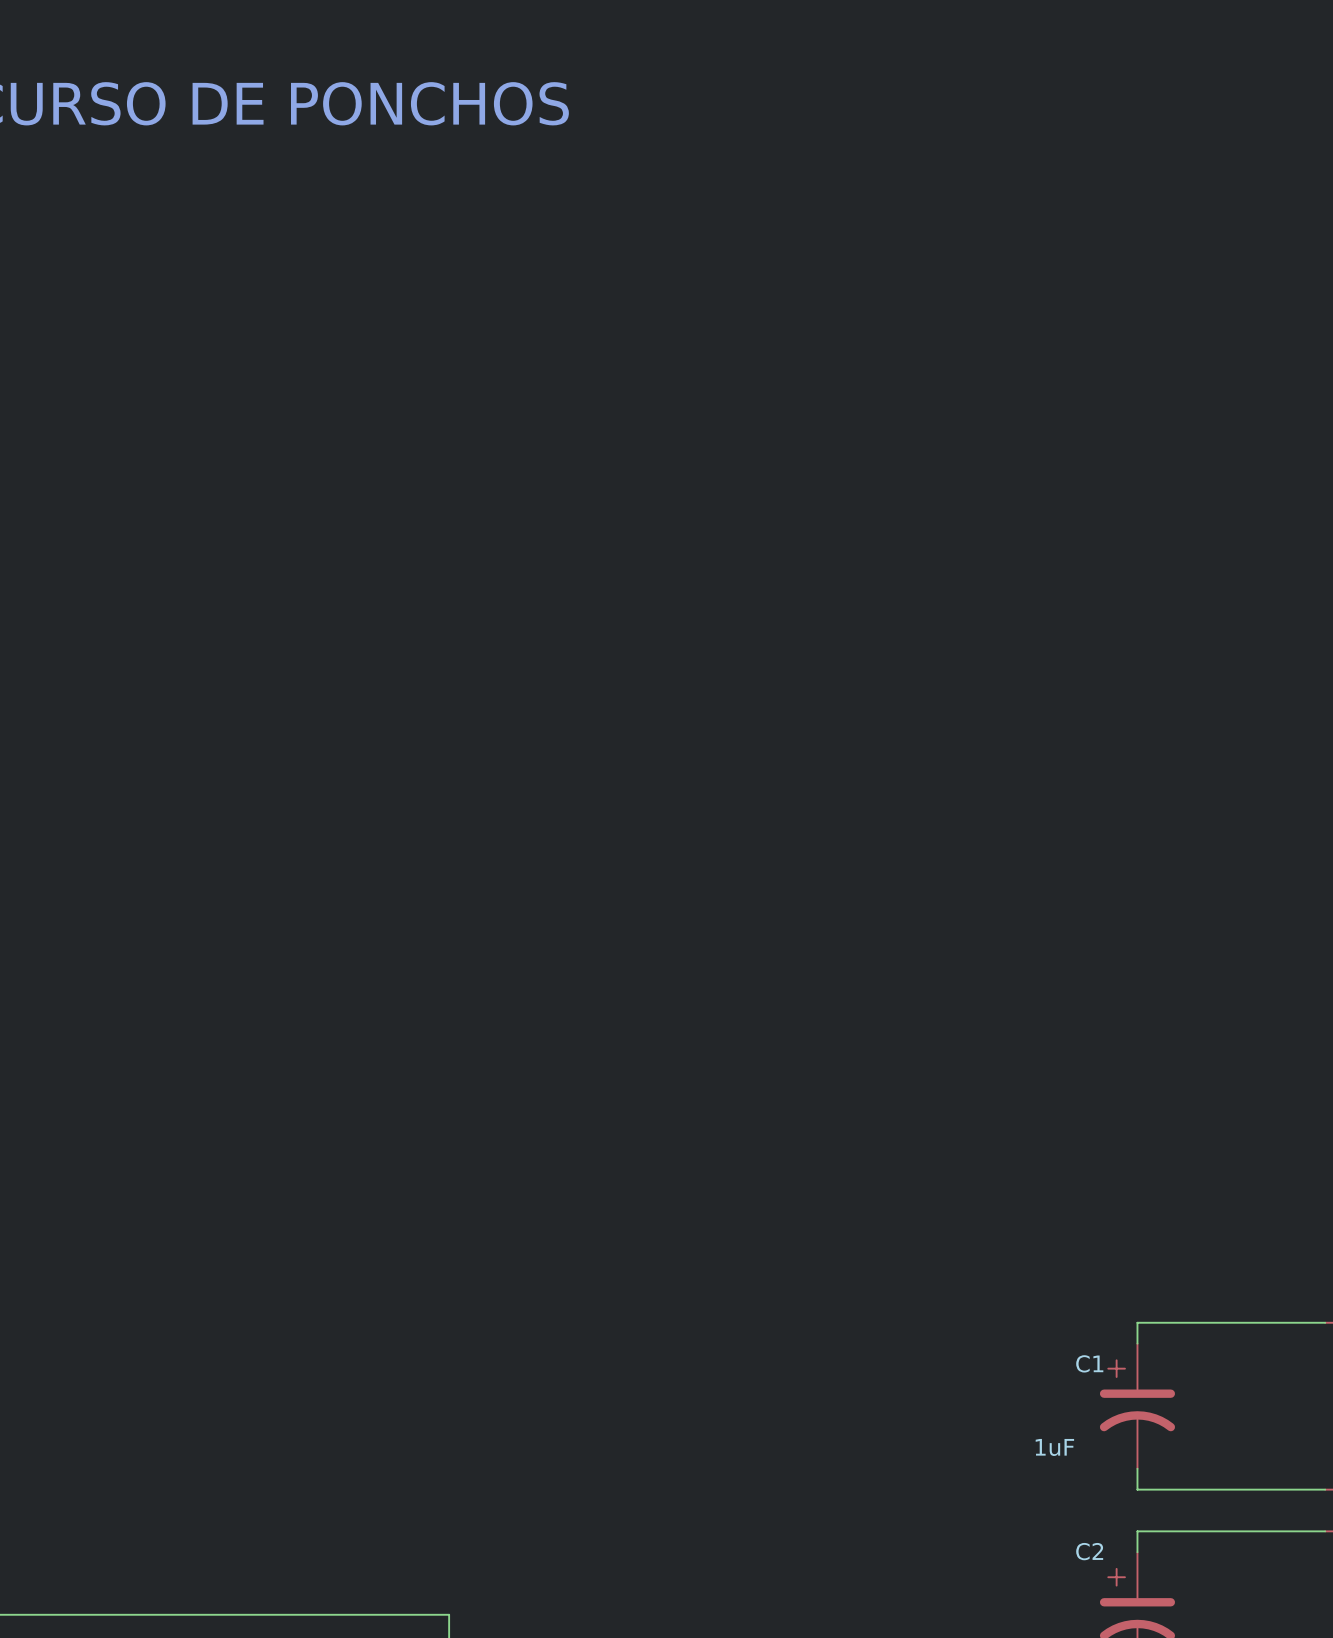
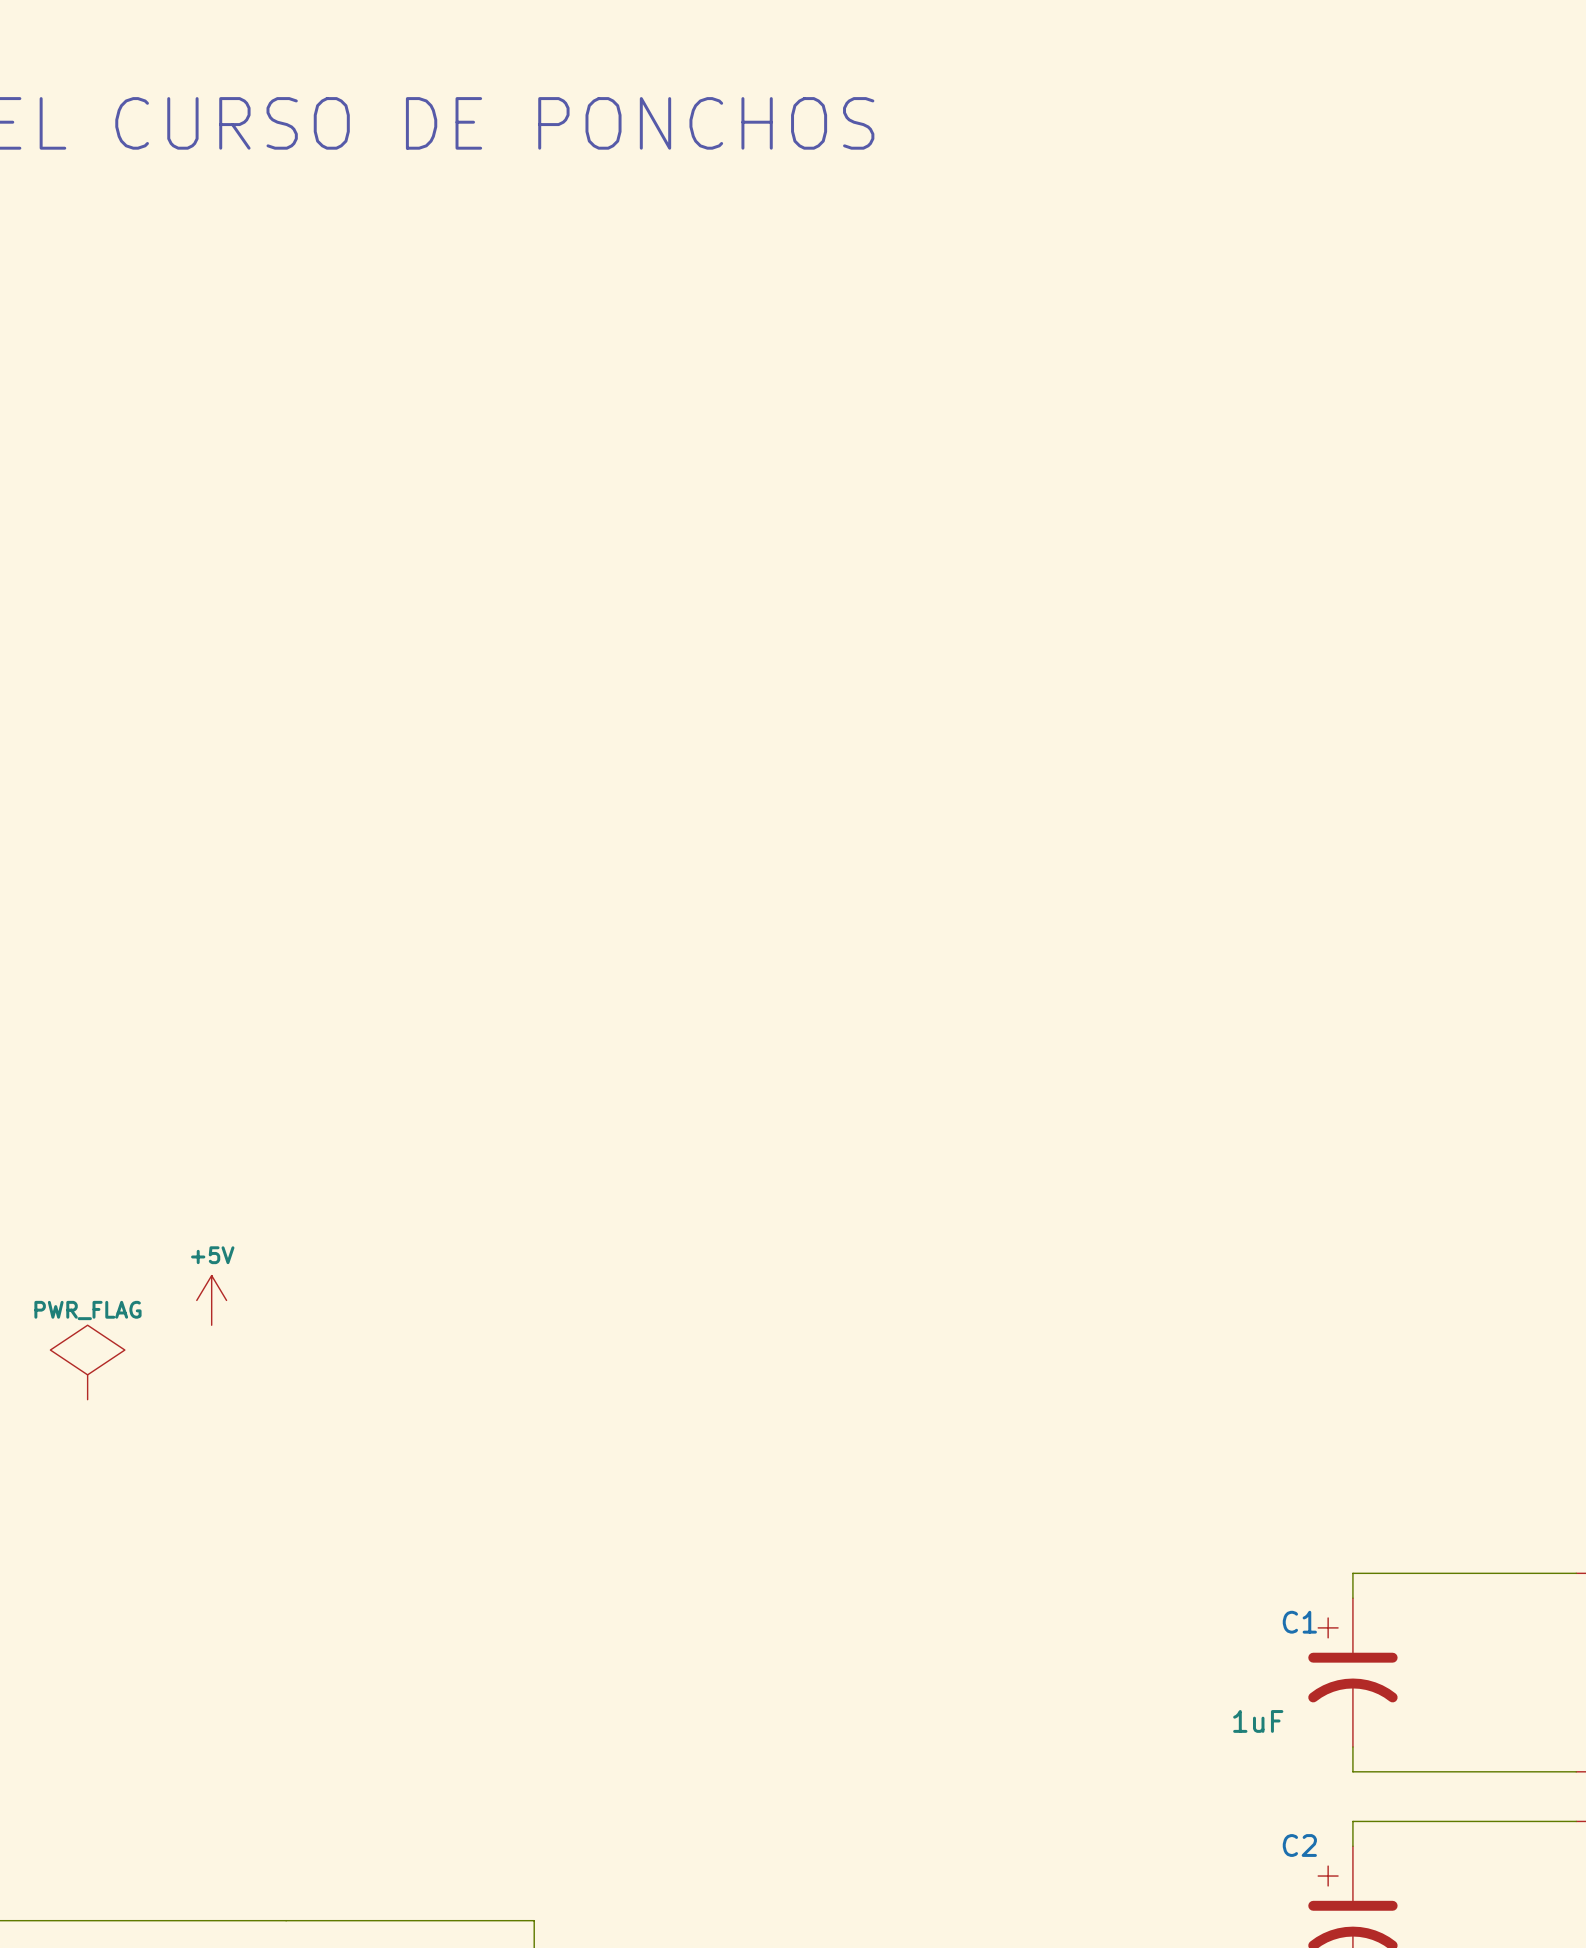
power symbol: none -> +5V (211, 1300)
power symbol: none -> PWR_FLAG (87, 1362)

